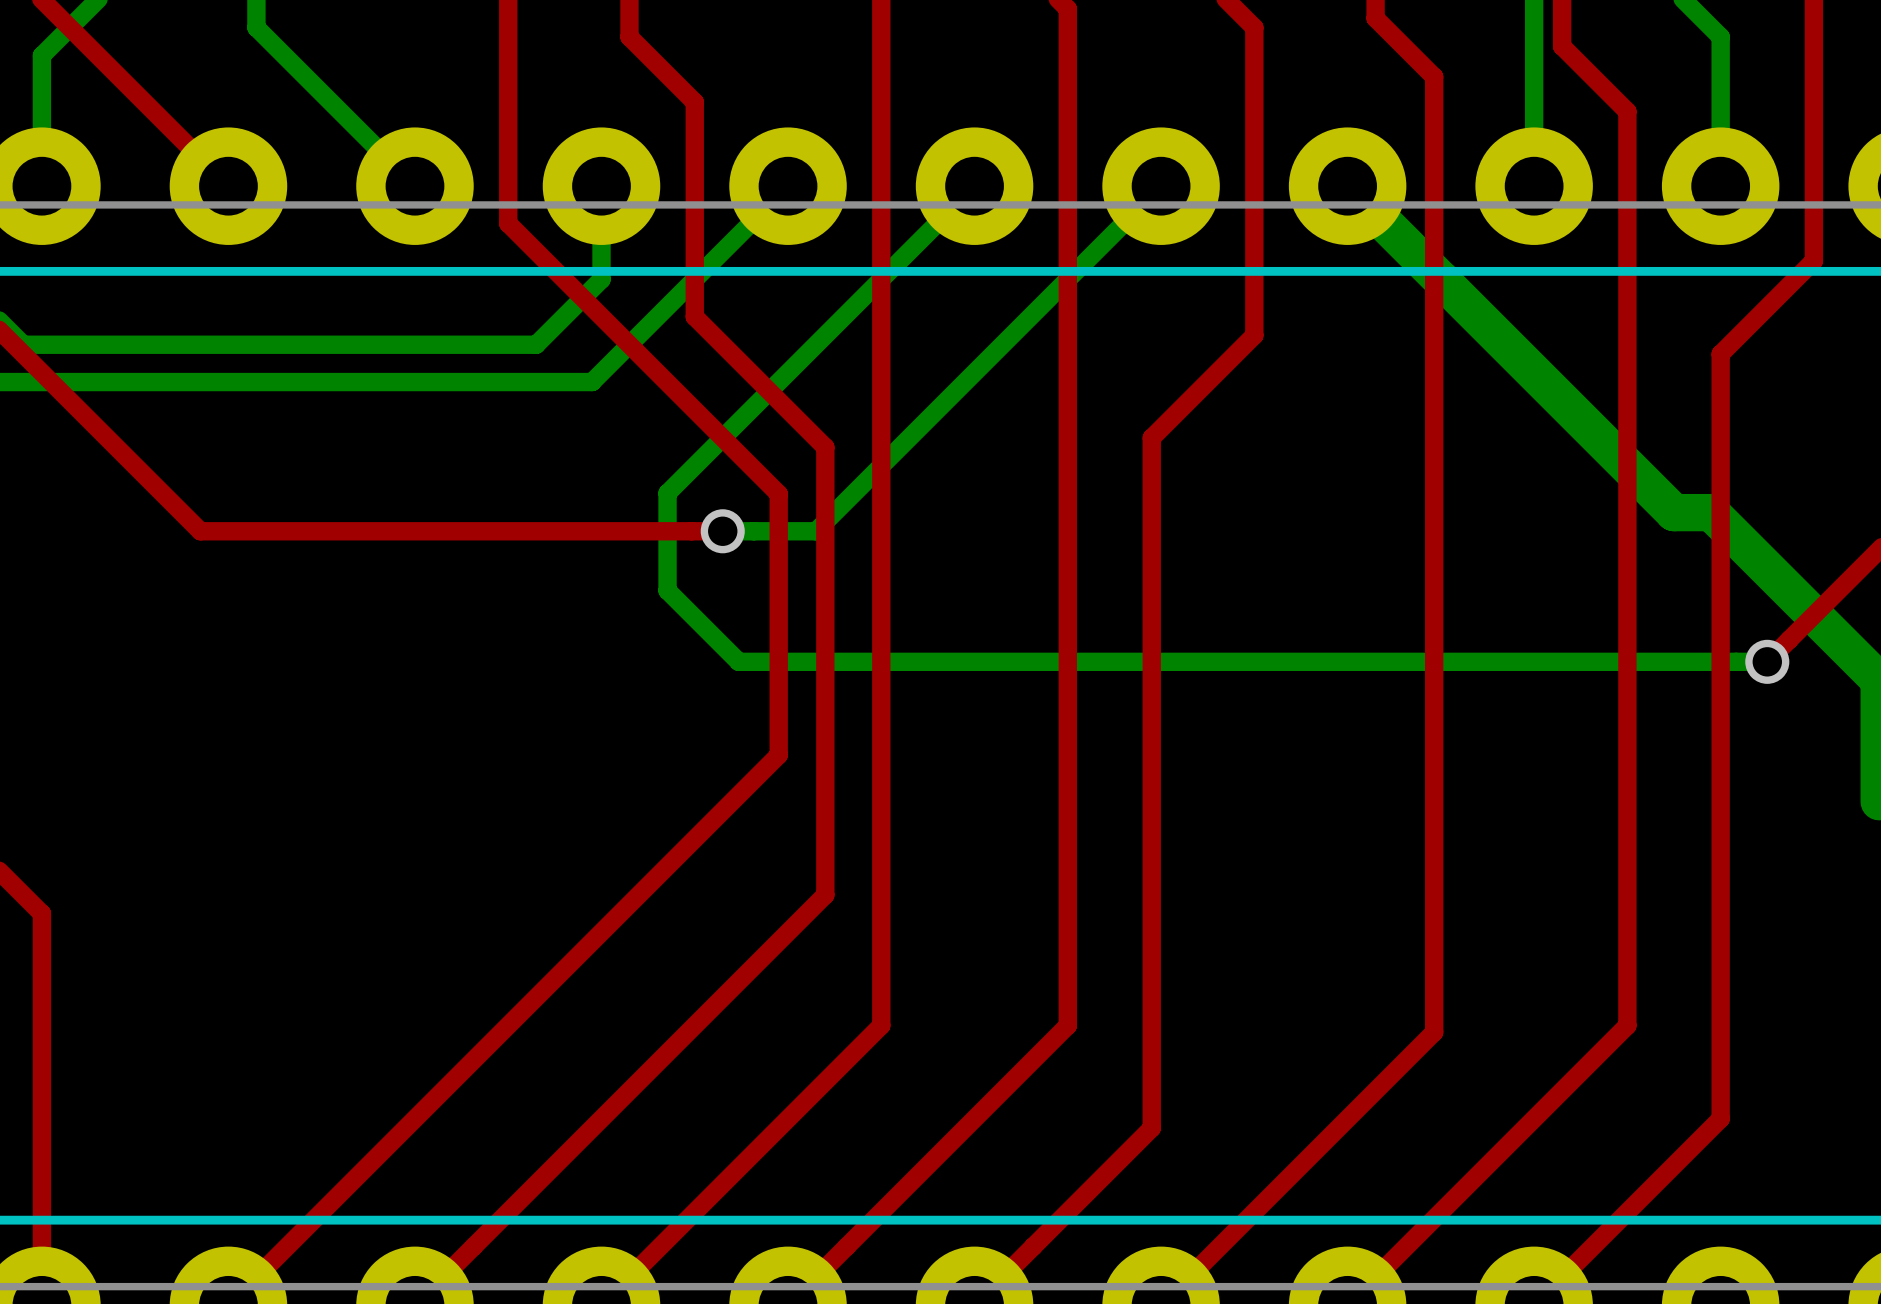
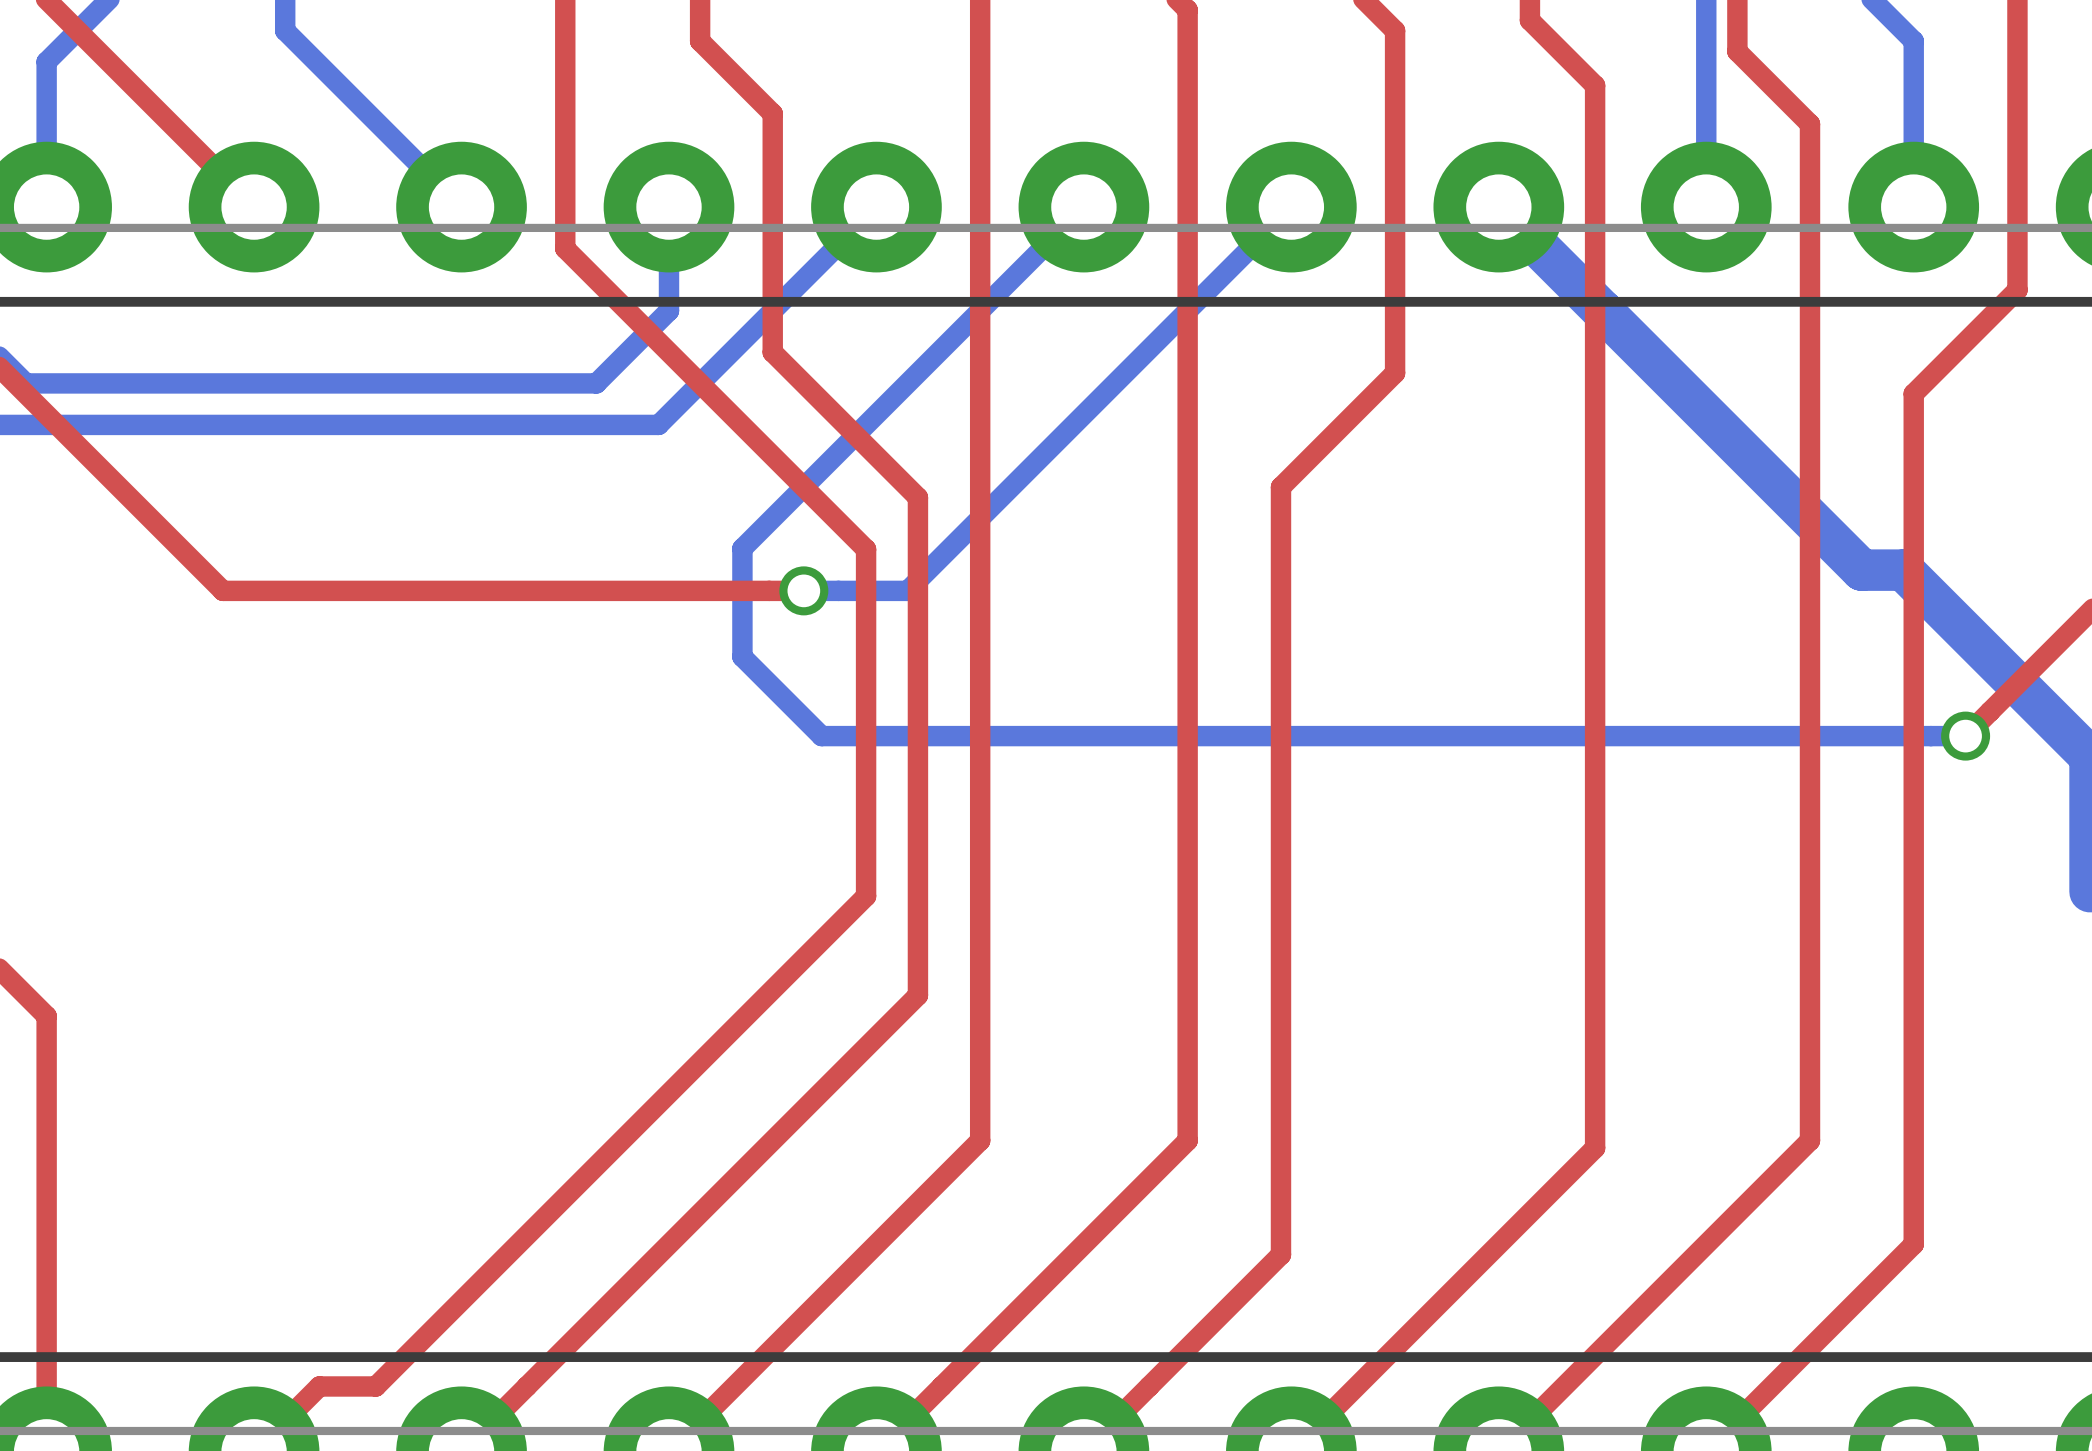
top track: (778, 755) (287, 1246) -> (866, 839) (866, 896) (375, 1386) (319, 1386)

